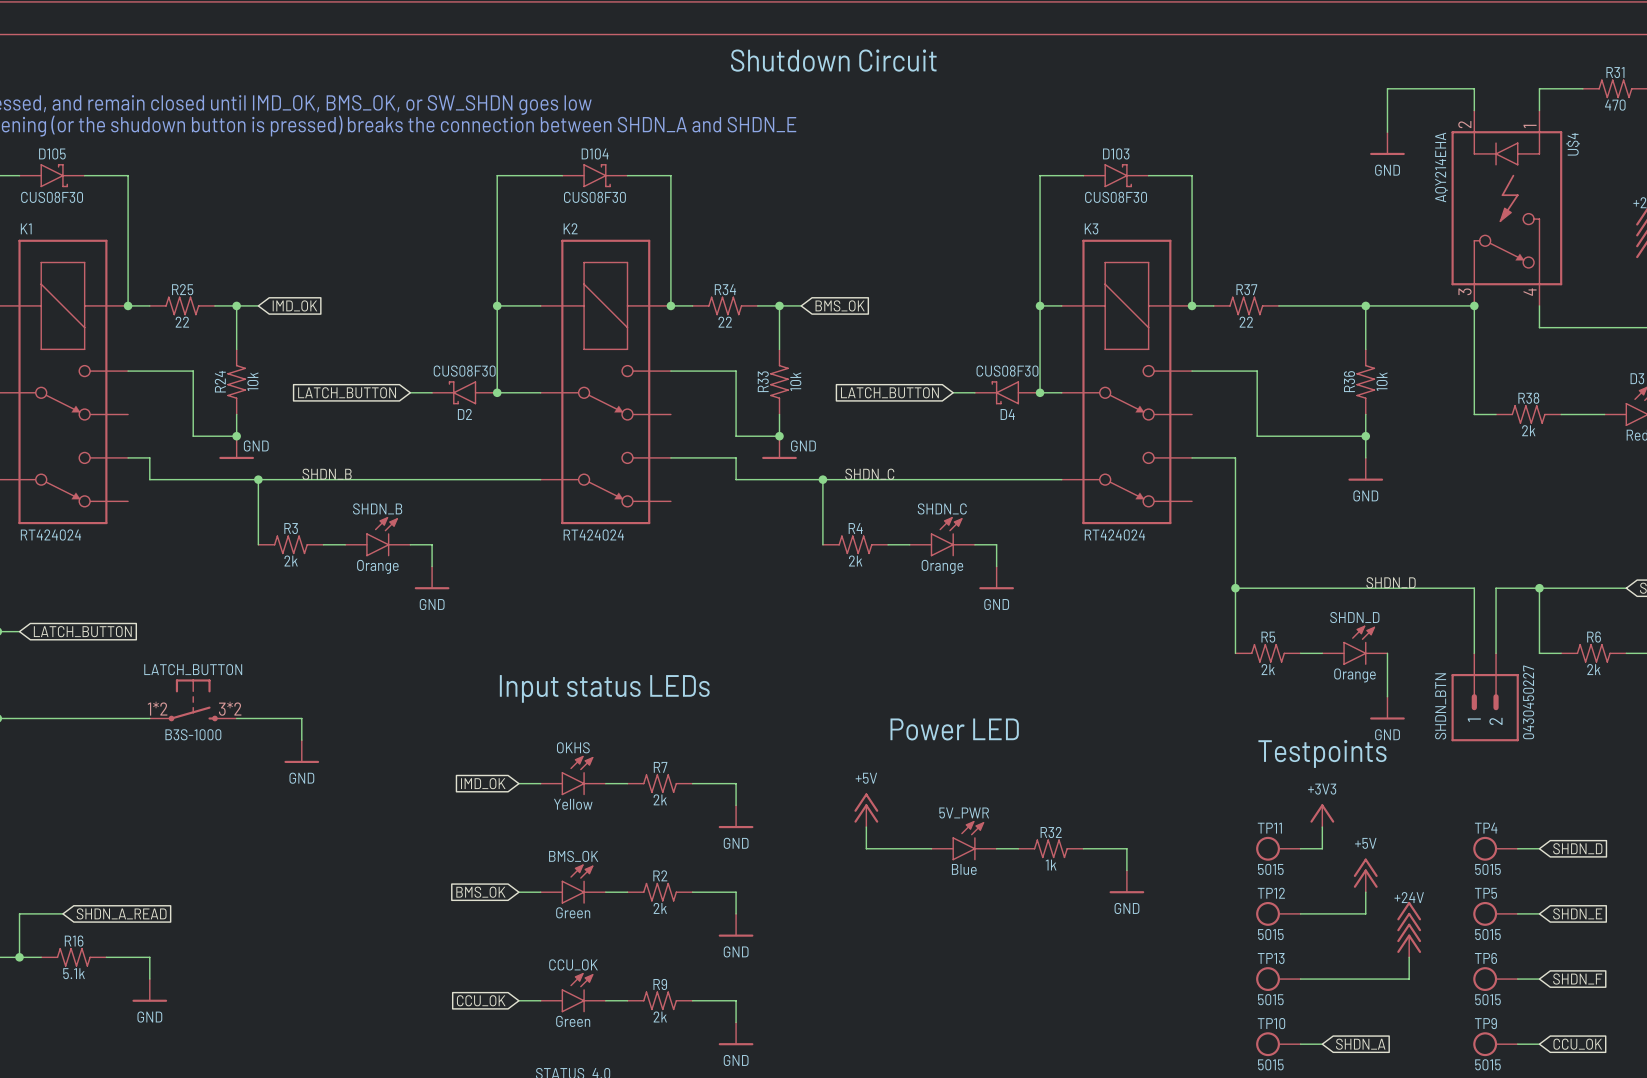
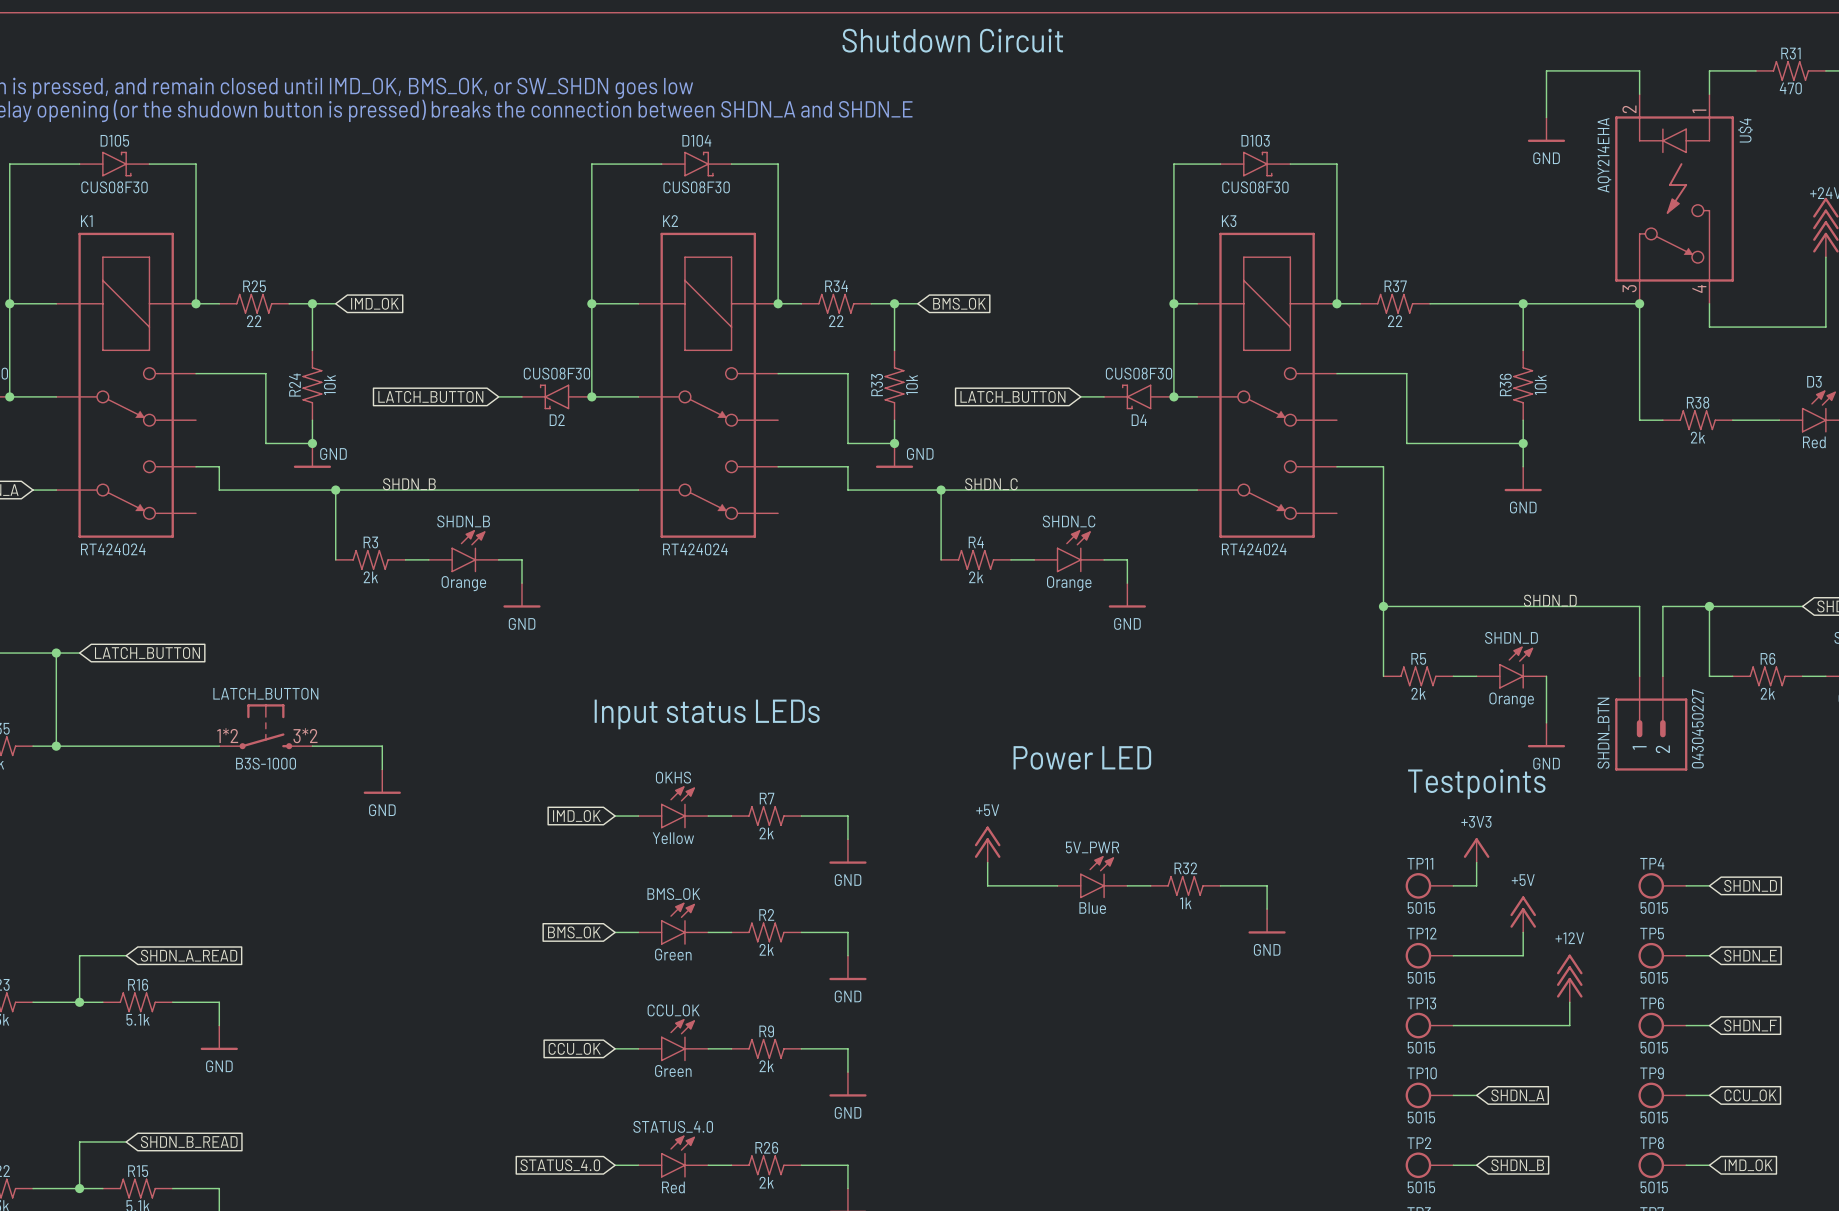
power symbol: +24V (1409, 929) -> +12V (1569, 978)

